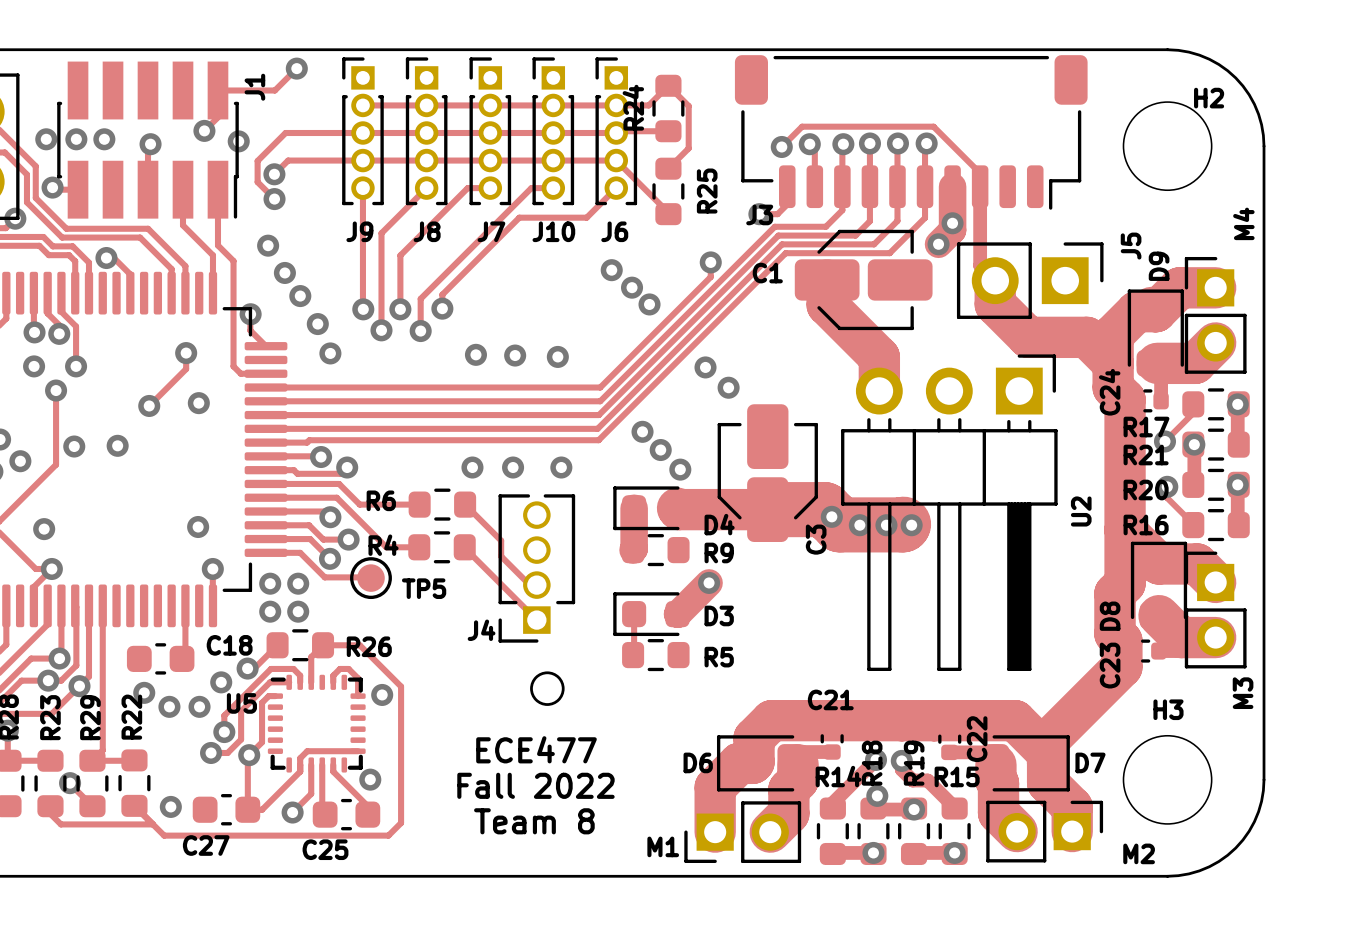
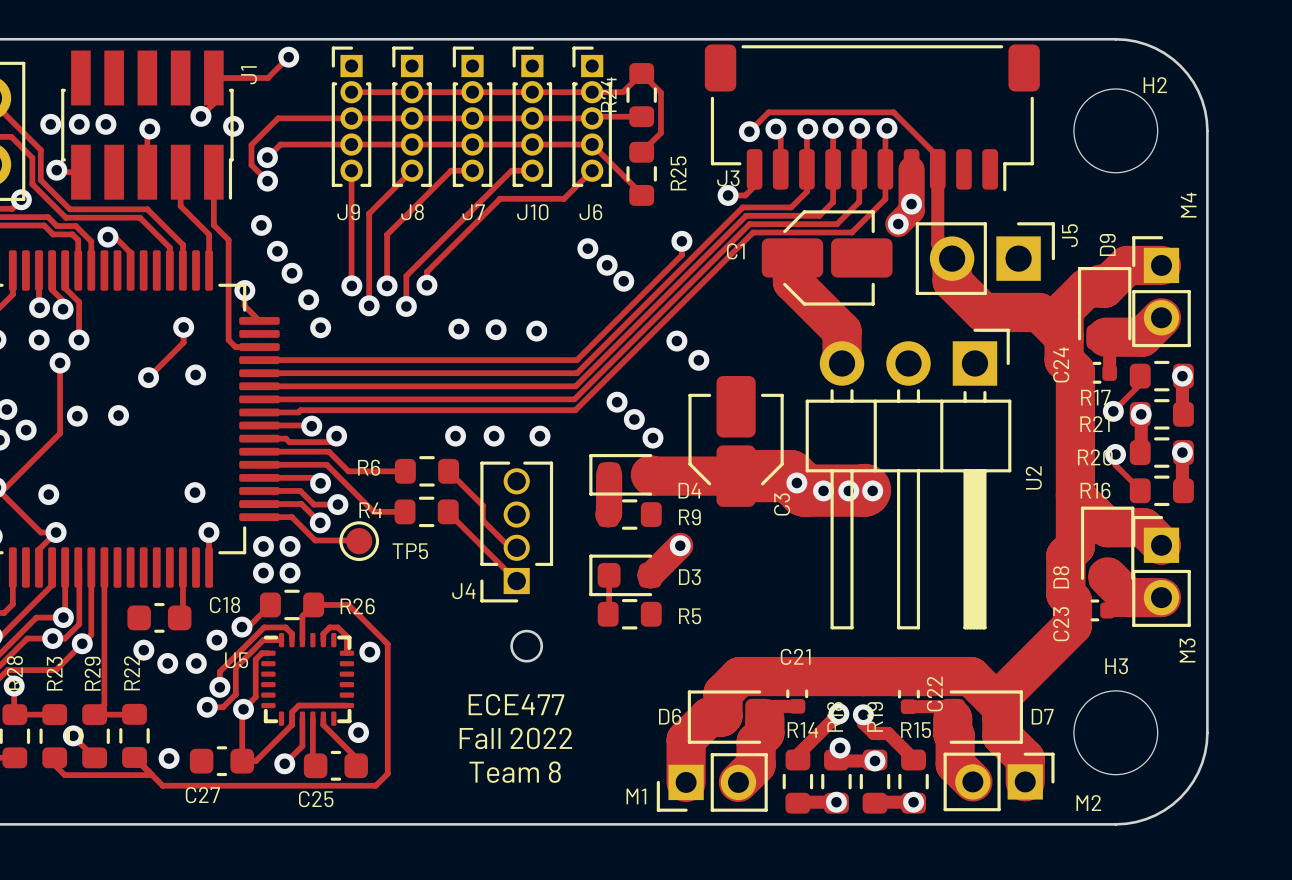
J3 name position: J3 (759, 214) -> J3 (728, 178)
J5 name position: J5 (1131, 246) -> J5 (1069, 235)

